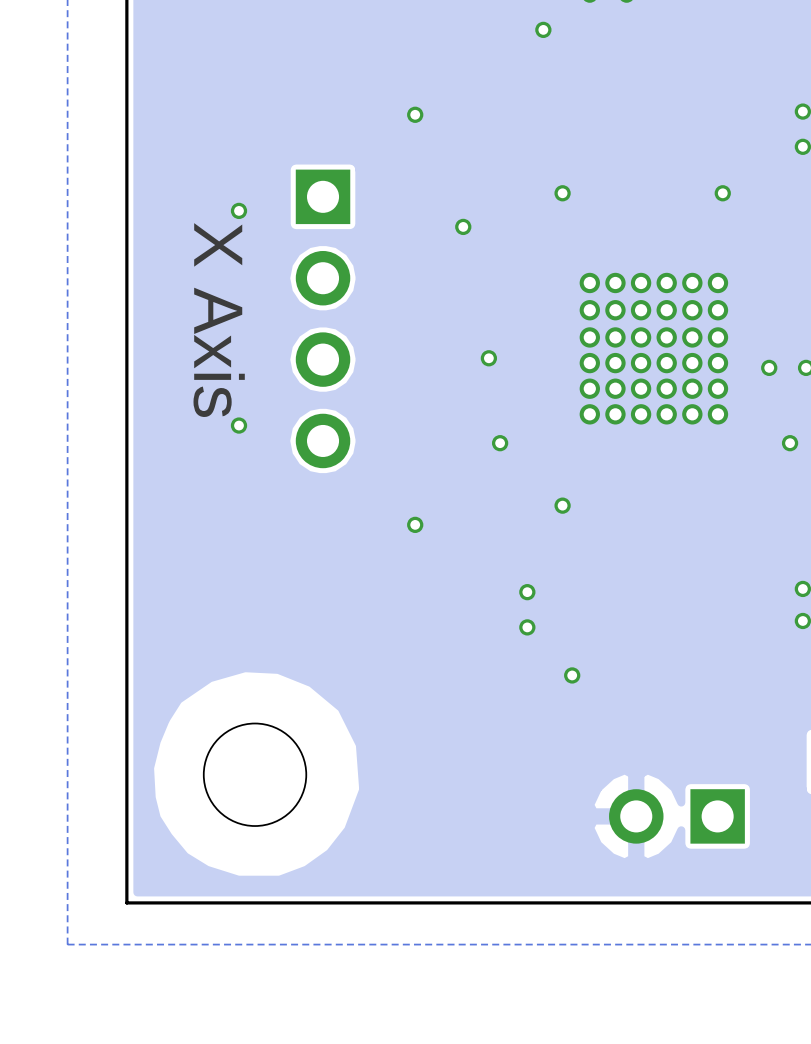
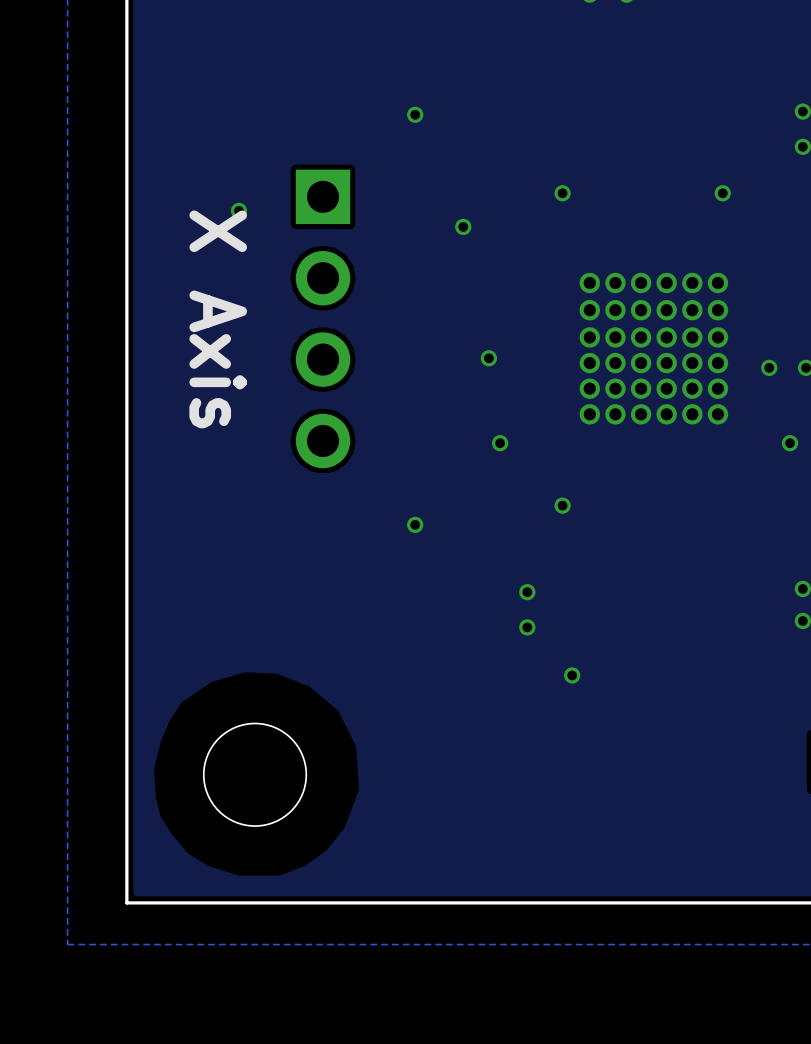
via: (543, 29) -> none
via: (239, 425) -> none
part: (676, 816) -> none

